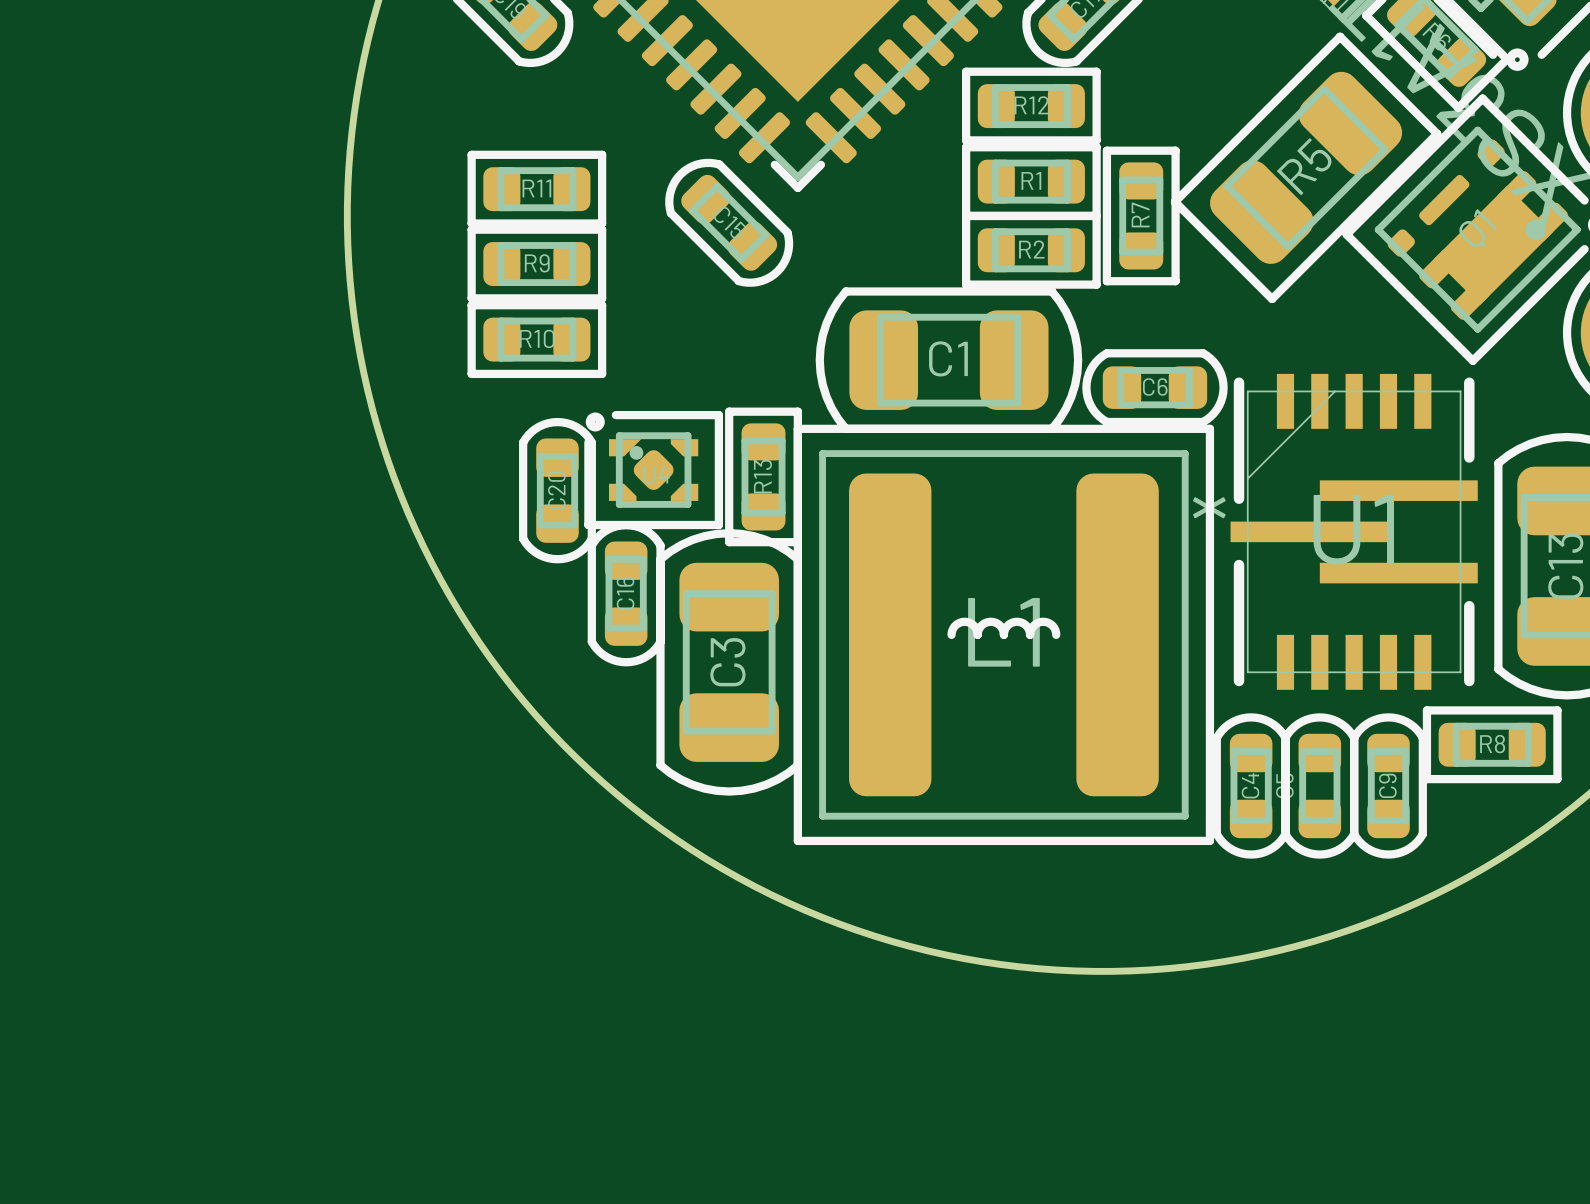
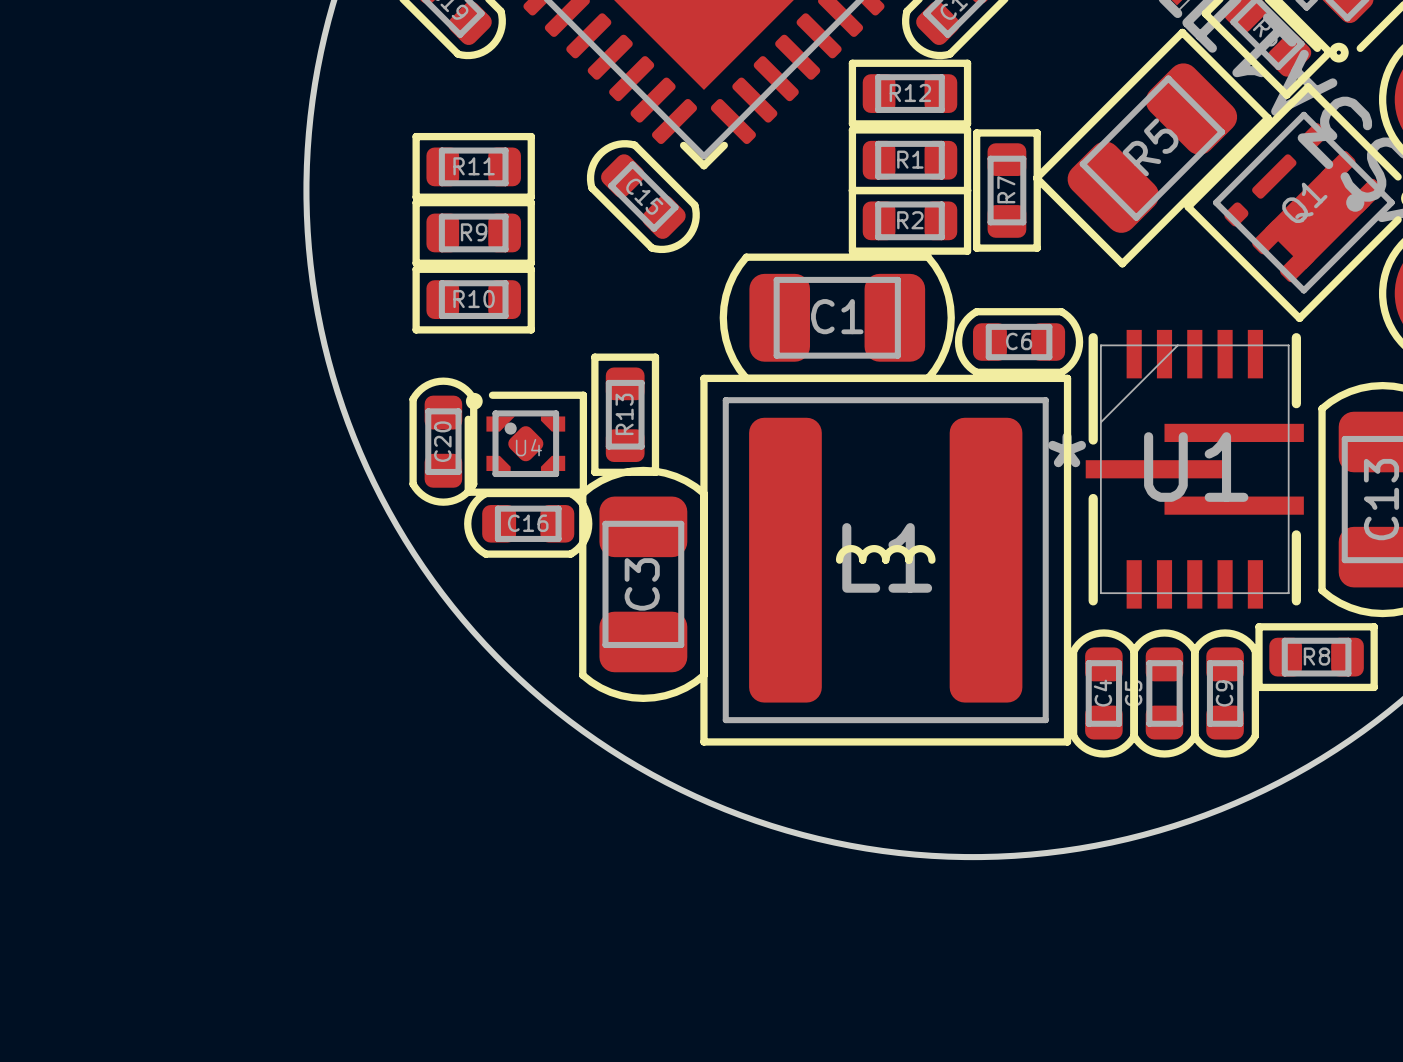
U4 position: (653, 470) -> (525, 443)
R13 position: (763, 476) -> (625, 414)
C20 position: (557, 490) -> (443, 441)
C16 rotation: 0° (626, 593) -> 90° clockwise (528, 523)

